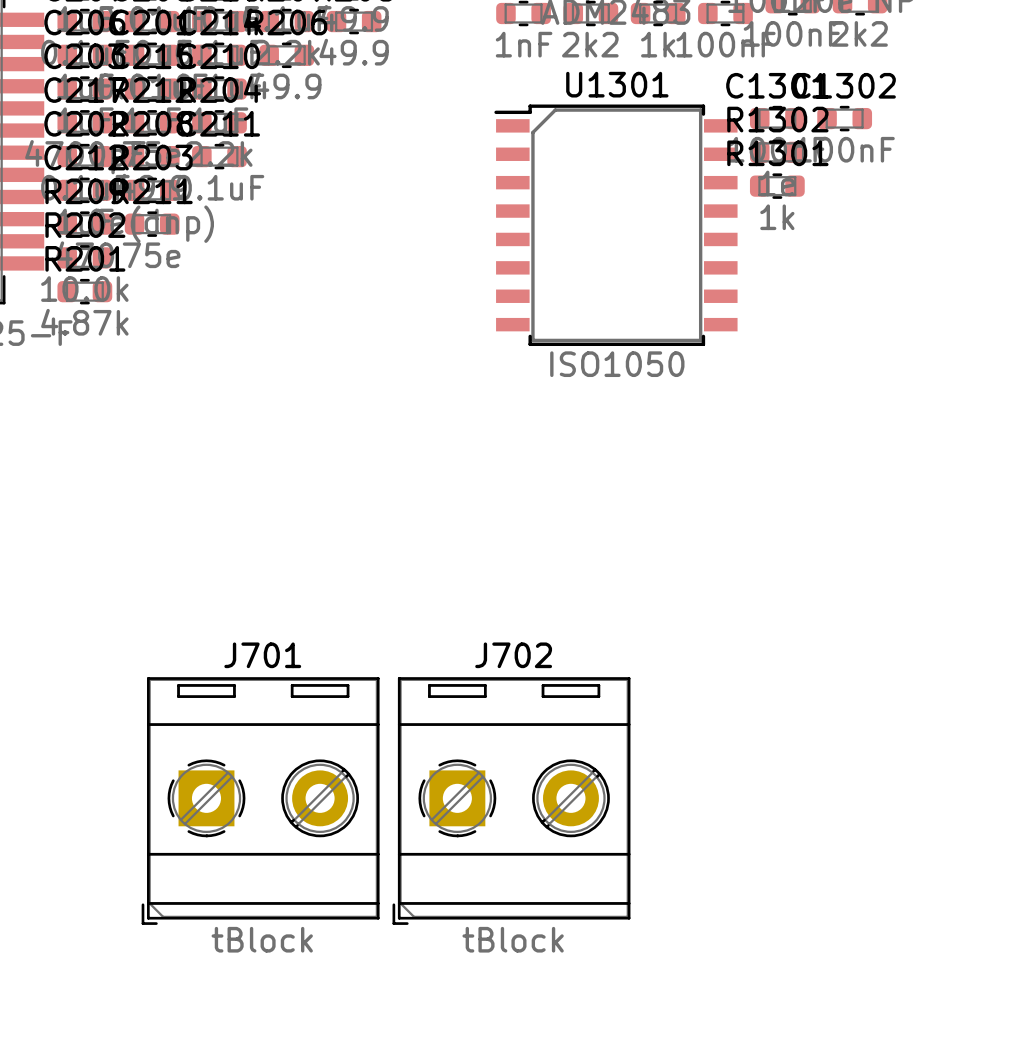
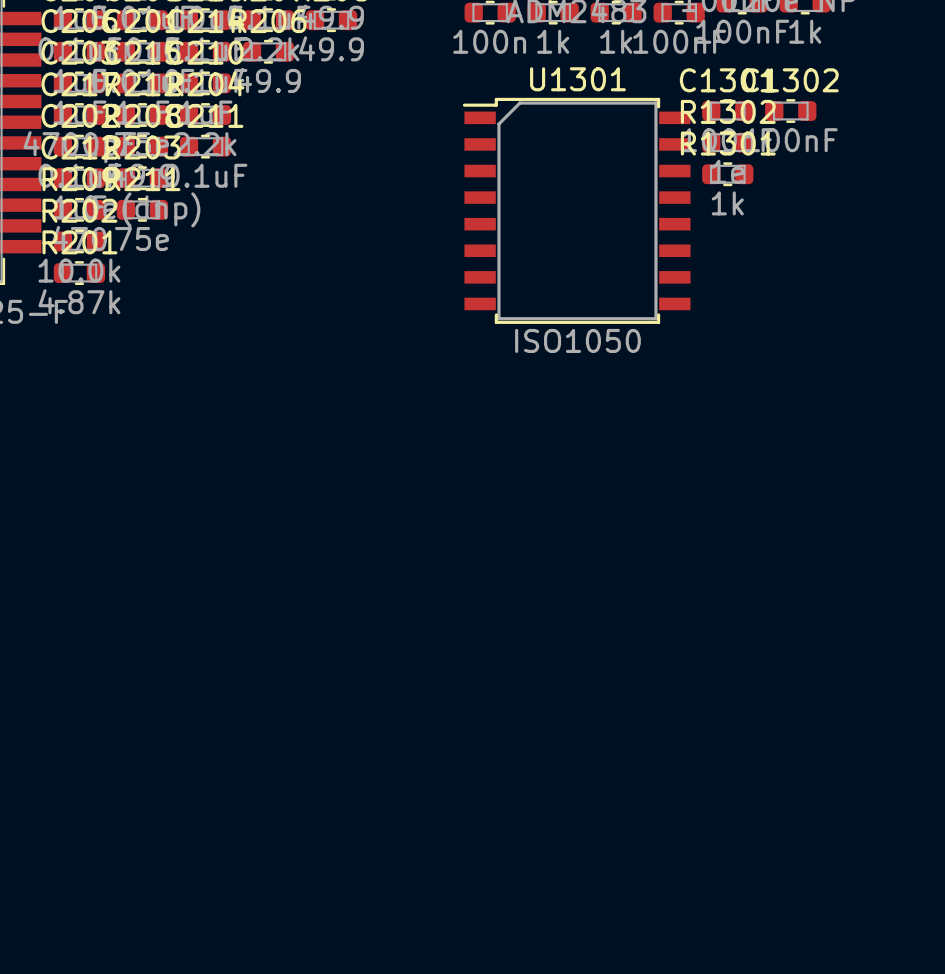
part value: 2k2 (859, 33) -> 1k (805, 31)
part value: 1nF (524, 44) -> 100n (489, 41)
part value: 2k2 (590, 44) -> 1k (553, 41)
J701: tBlock (260, 801) -> none
J702: tBlock (511, 801) -> none

